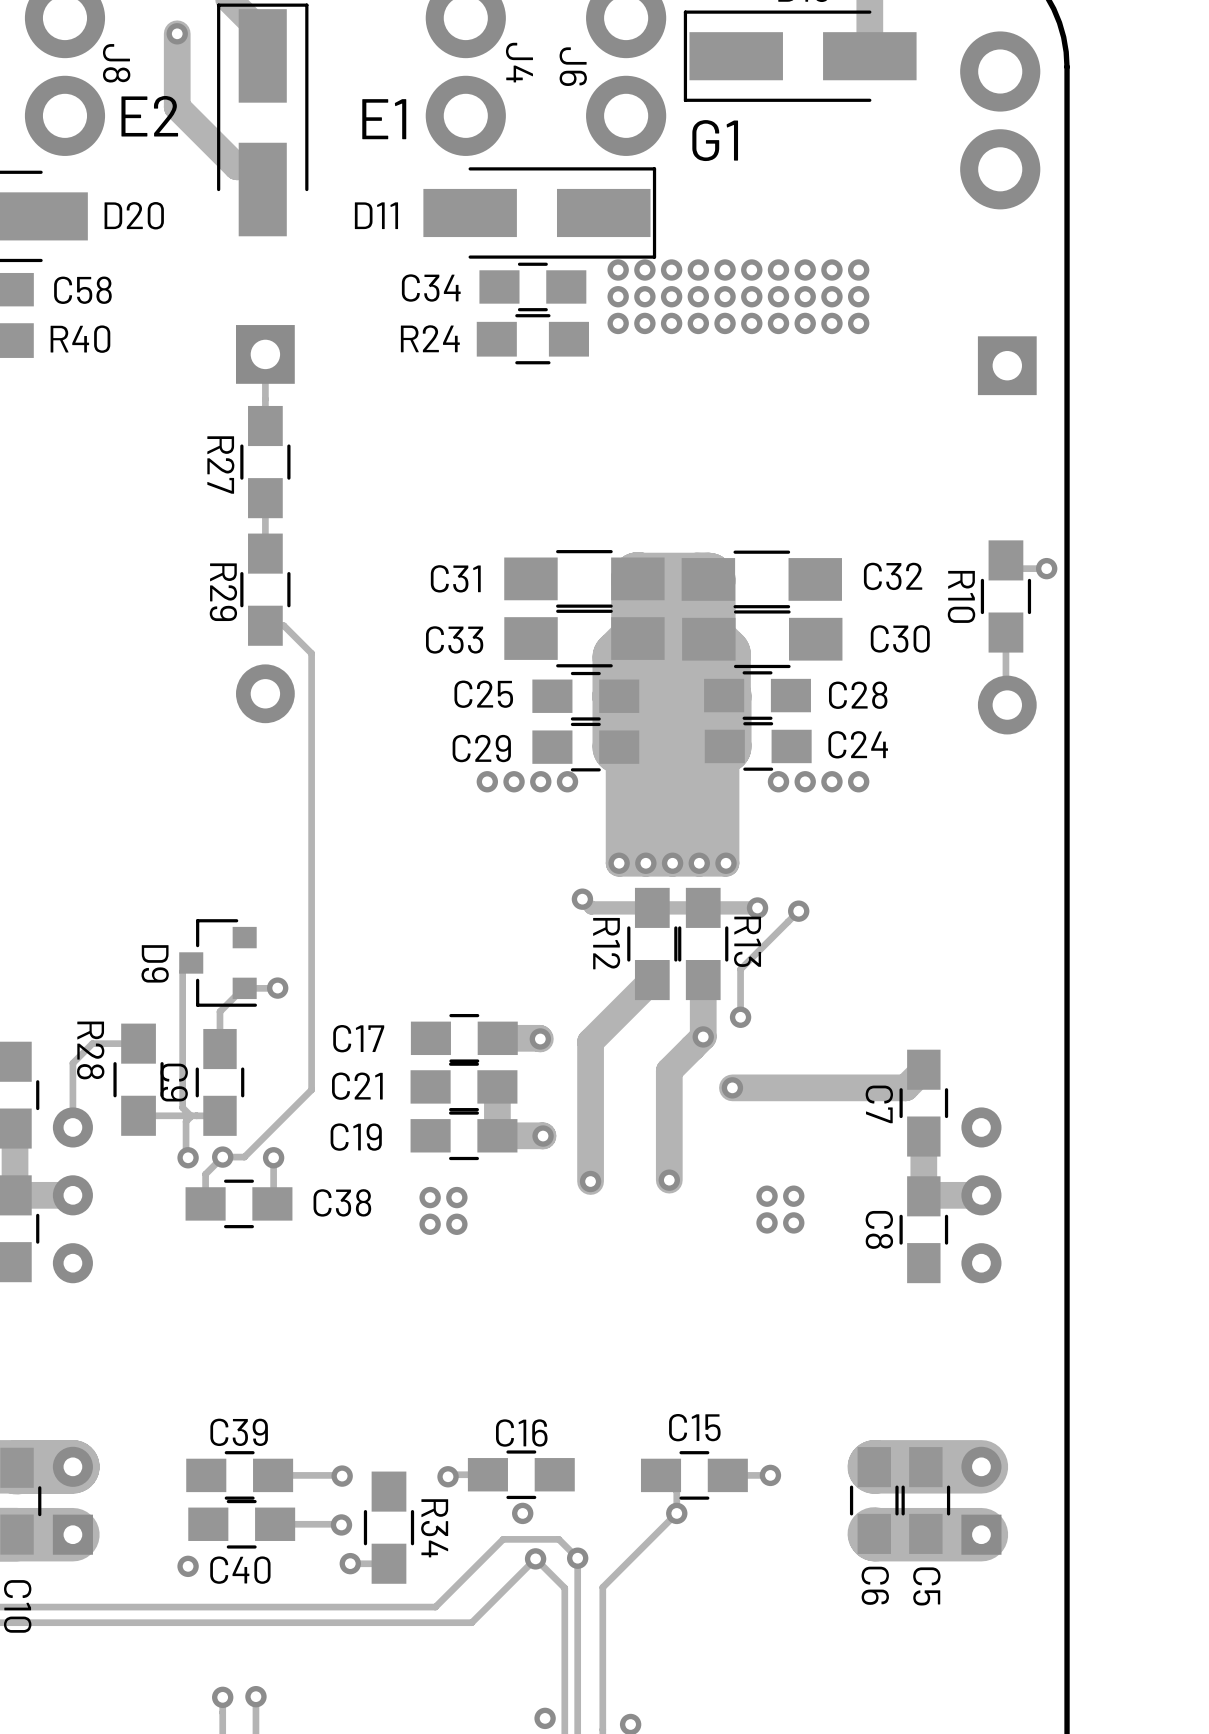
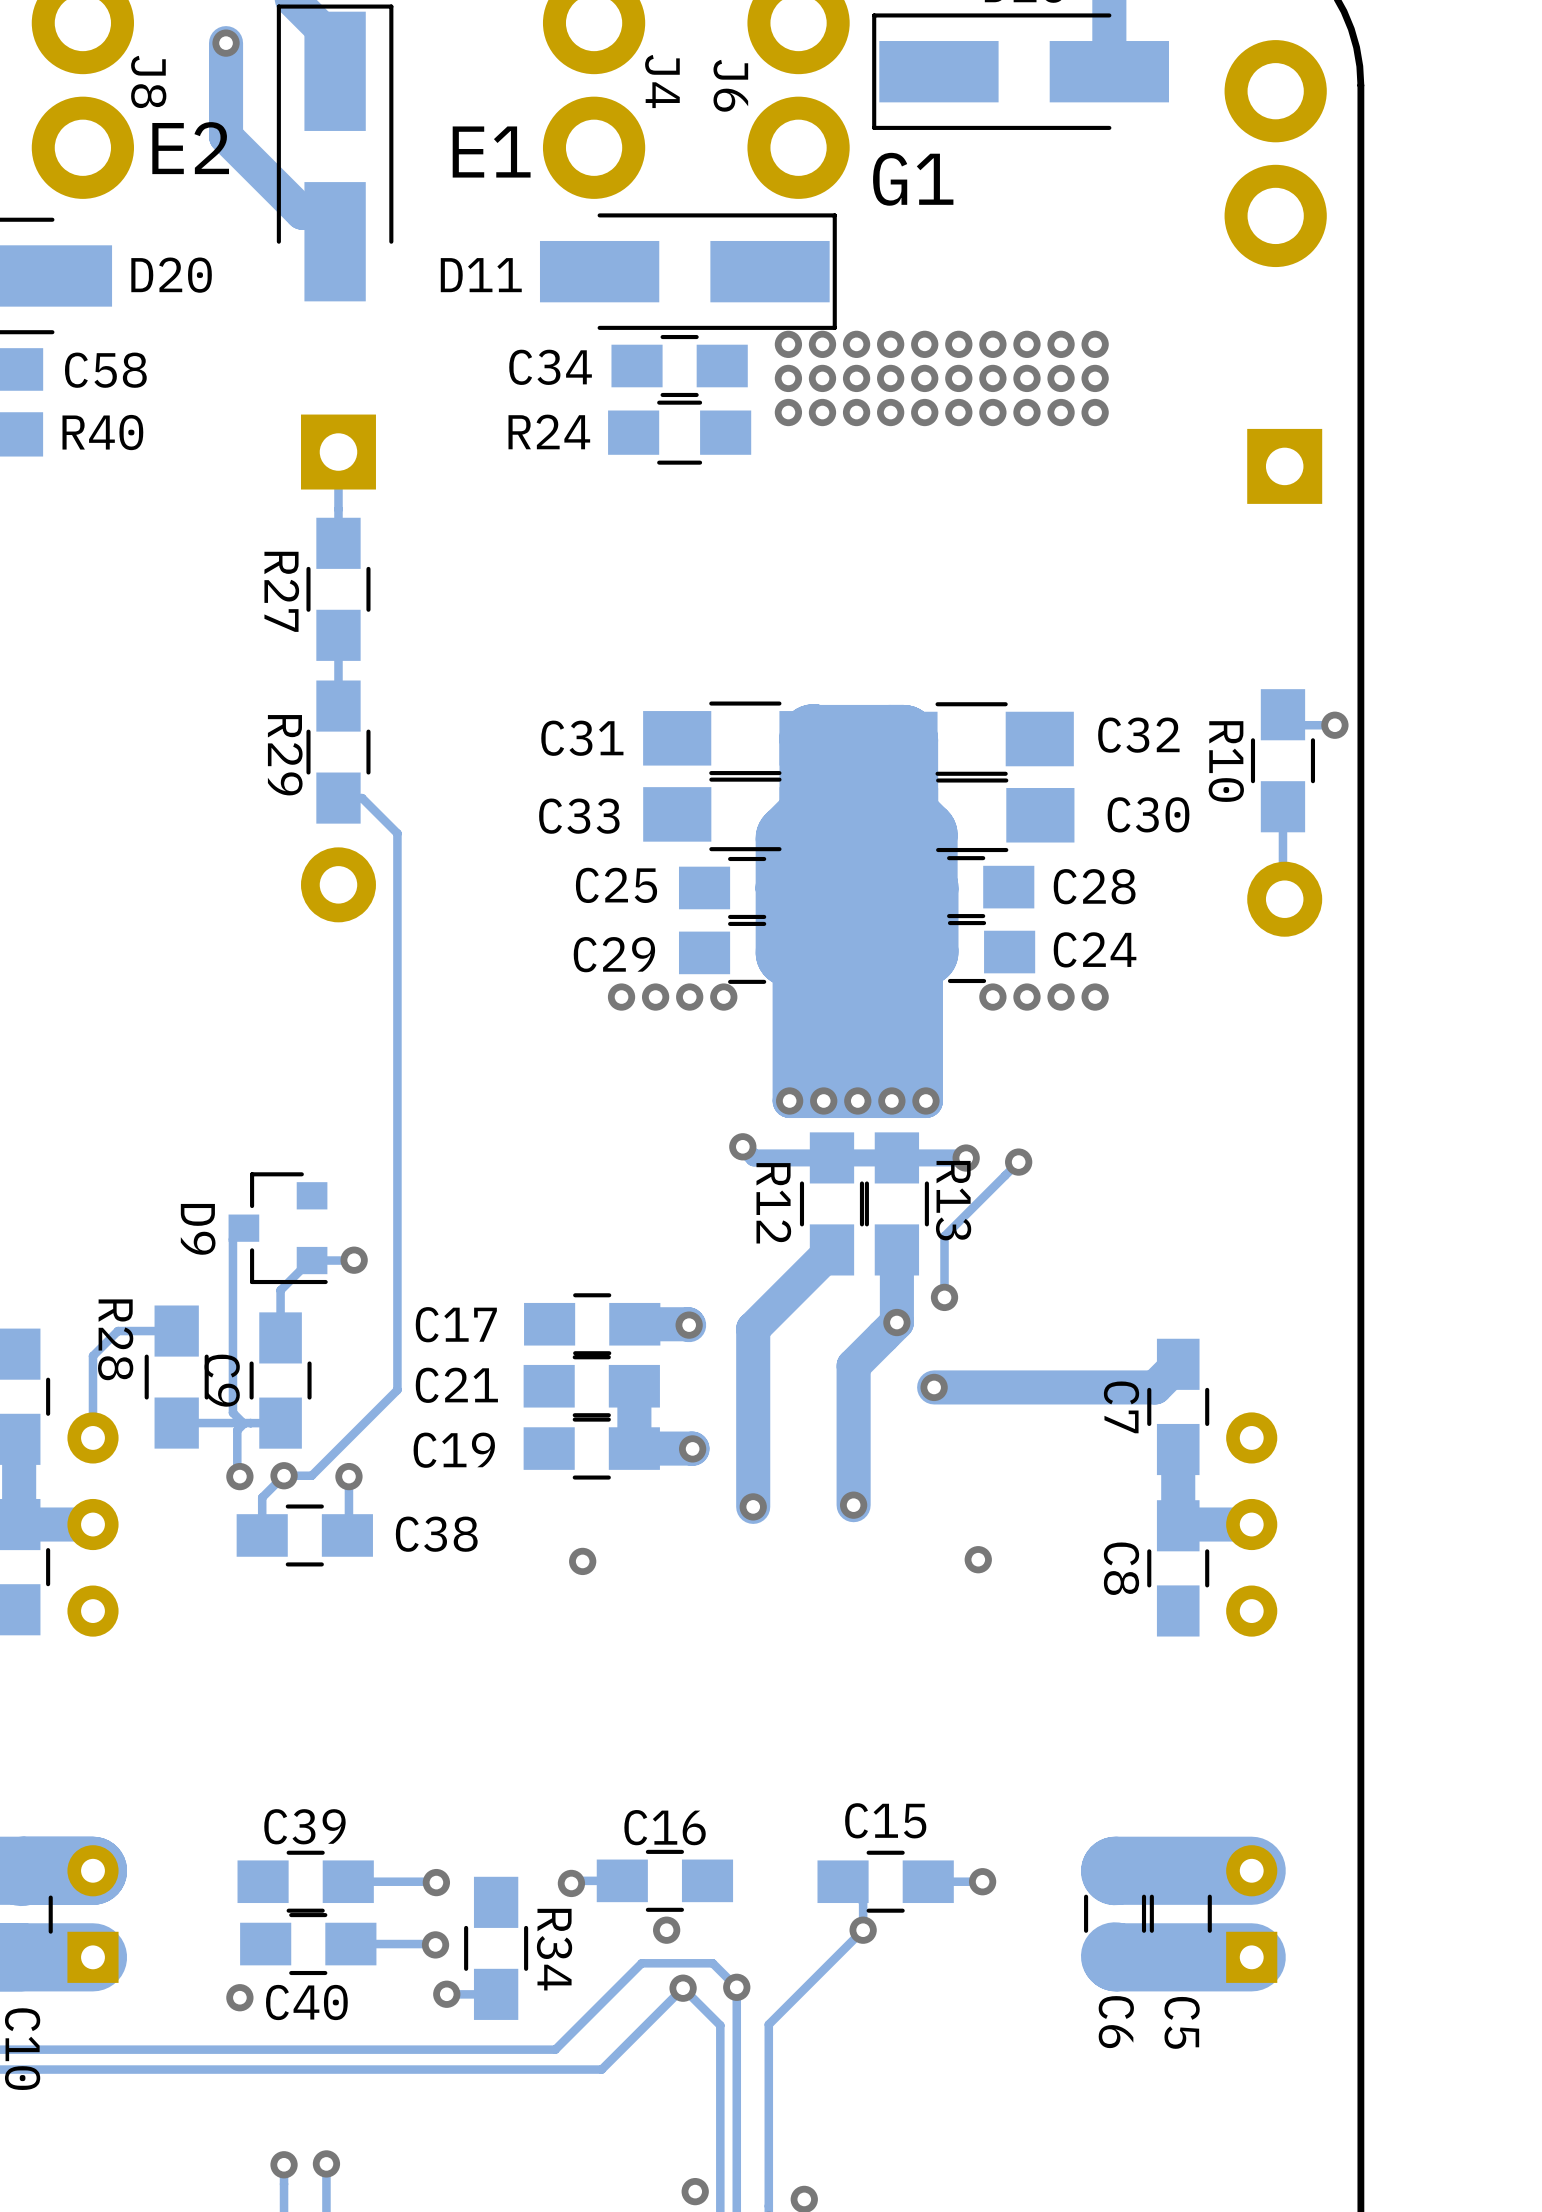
via: (767, 1196) -> none
via: (793, 1196) -> none
via: (430, 1197) -> none
via: (456, 1197) -> none
via: (793, 1222) -> none
via: (430, 1224) -> none

